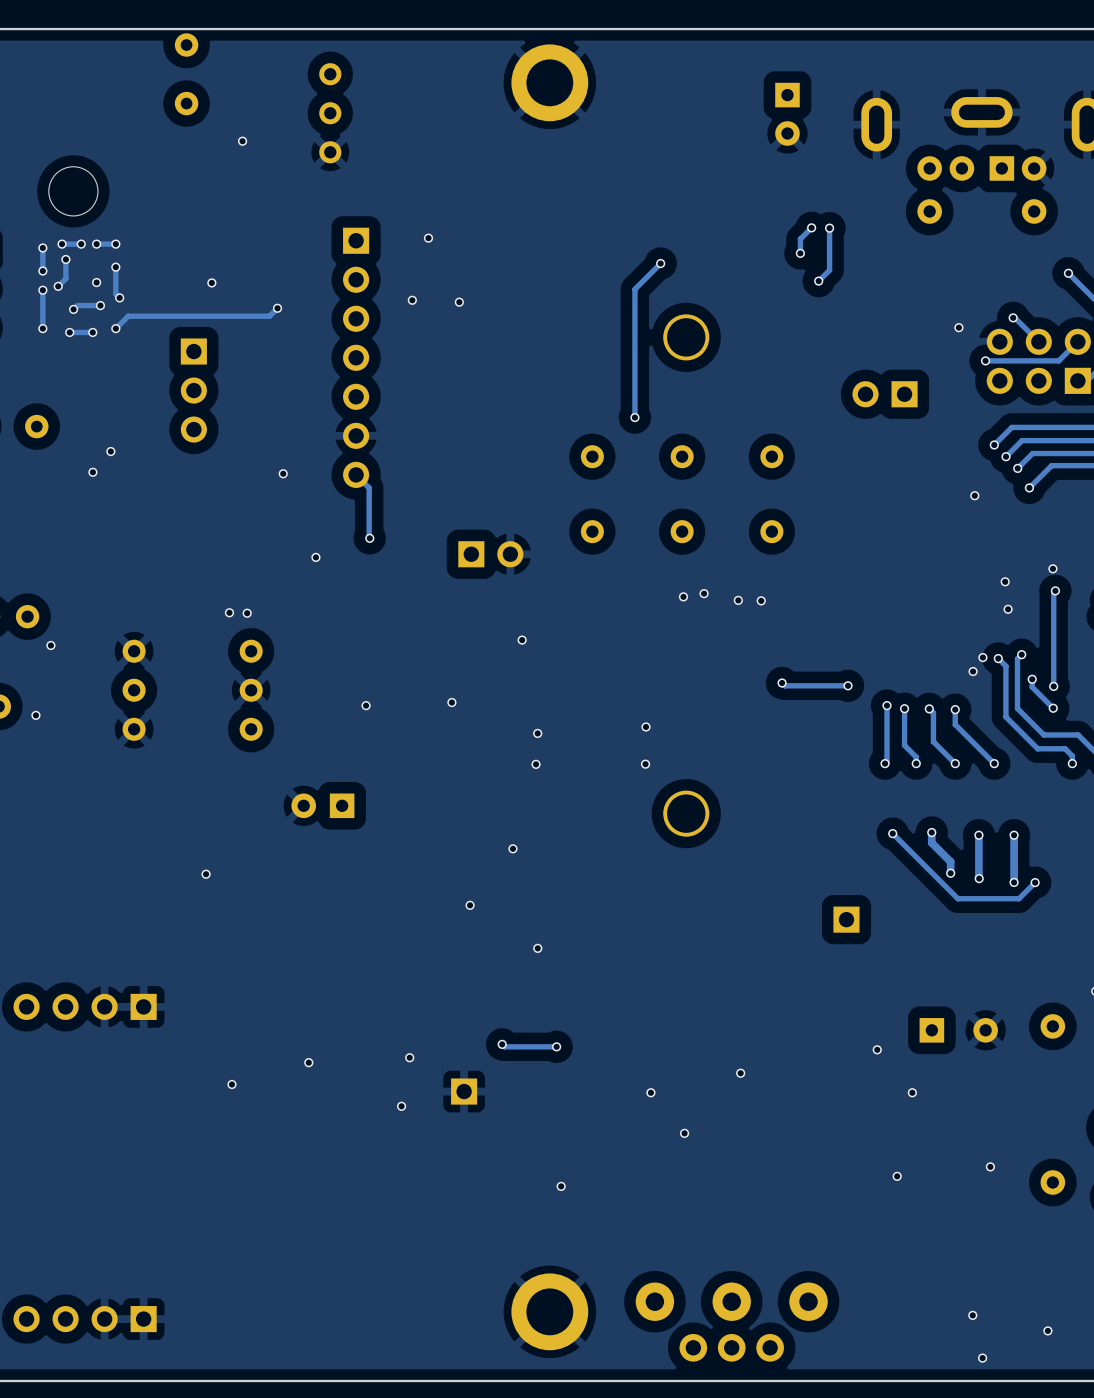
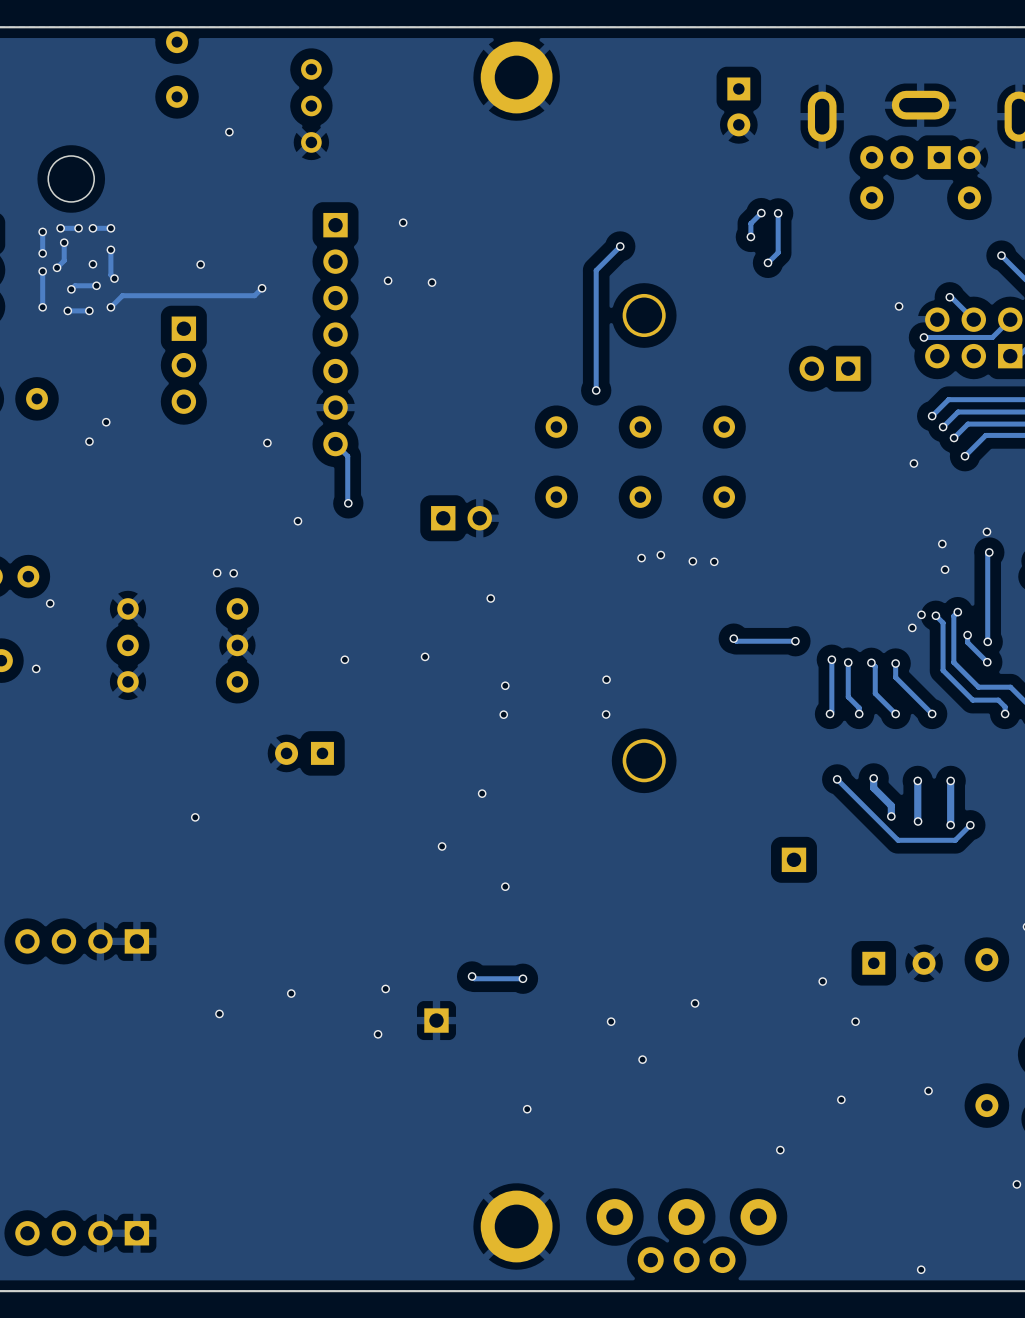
via: none -> (780, 1150)
via: none -> (1016, 1184)
via: (972, 1315) -> none
via: (1047, 1330) -> none

